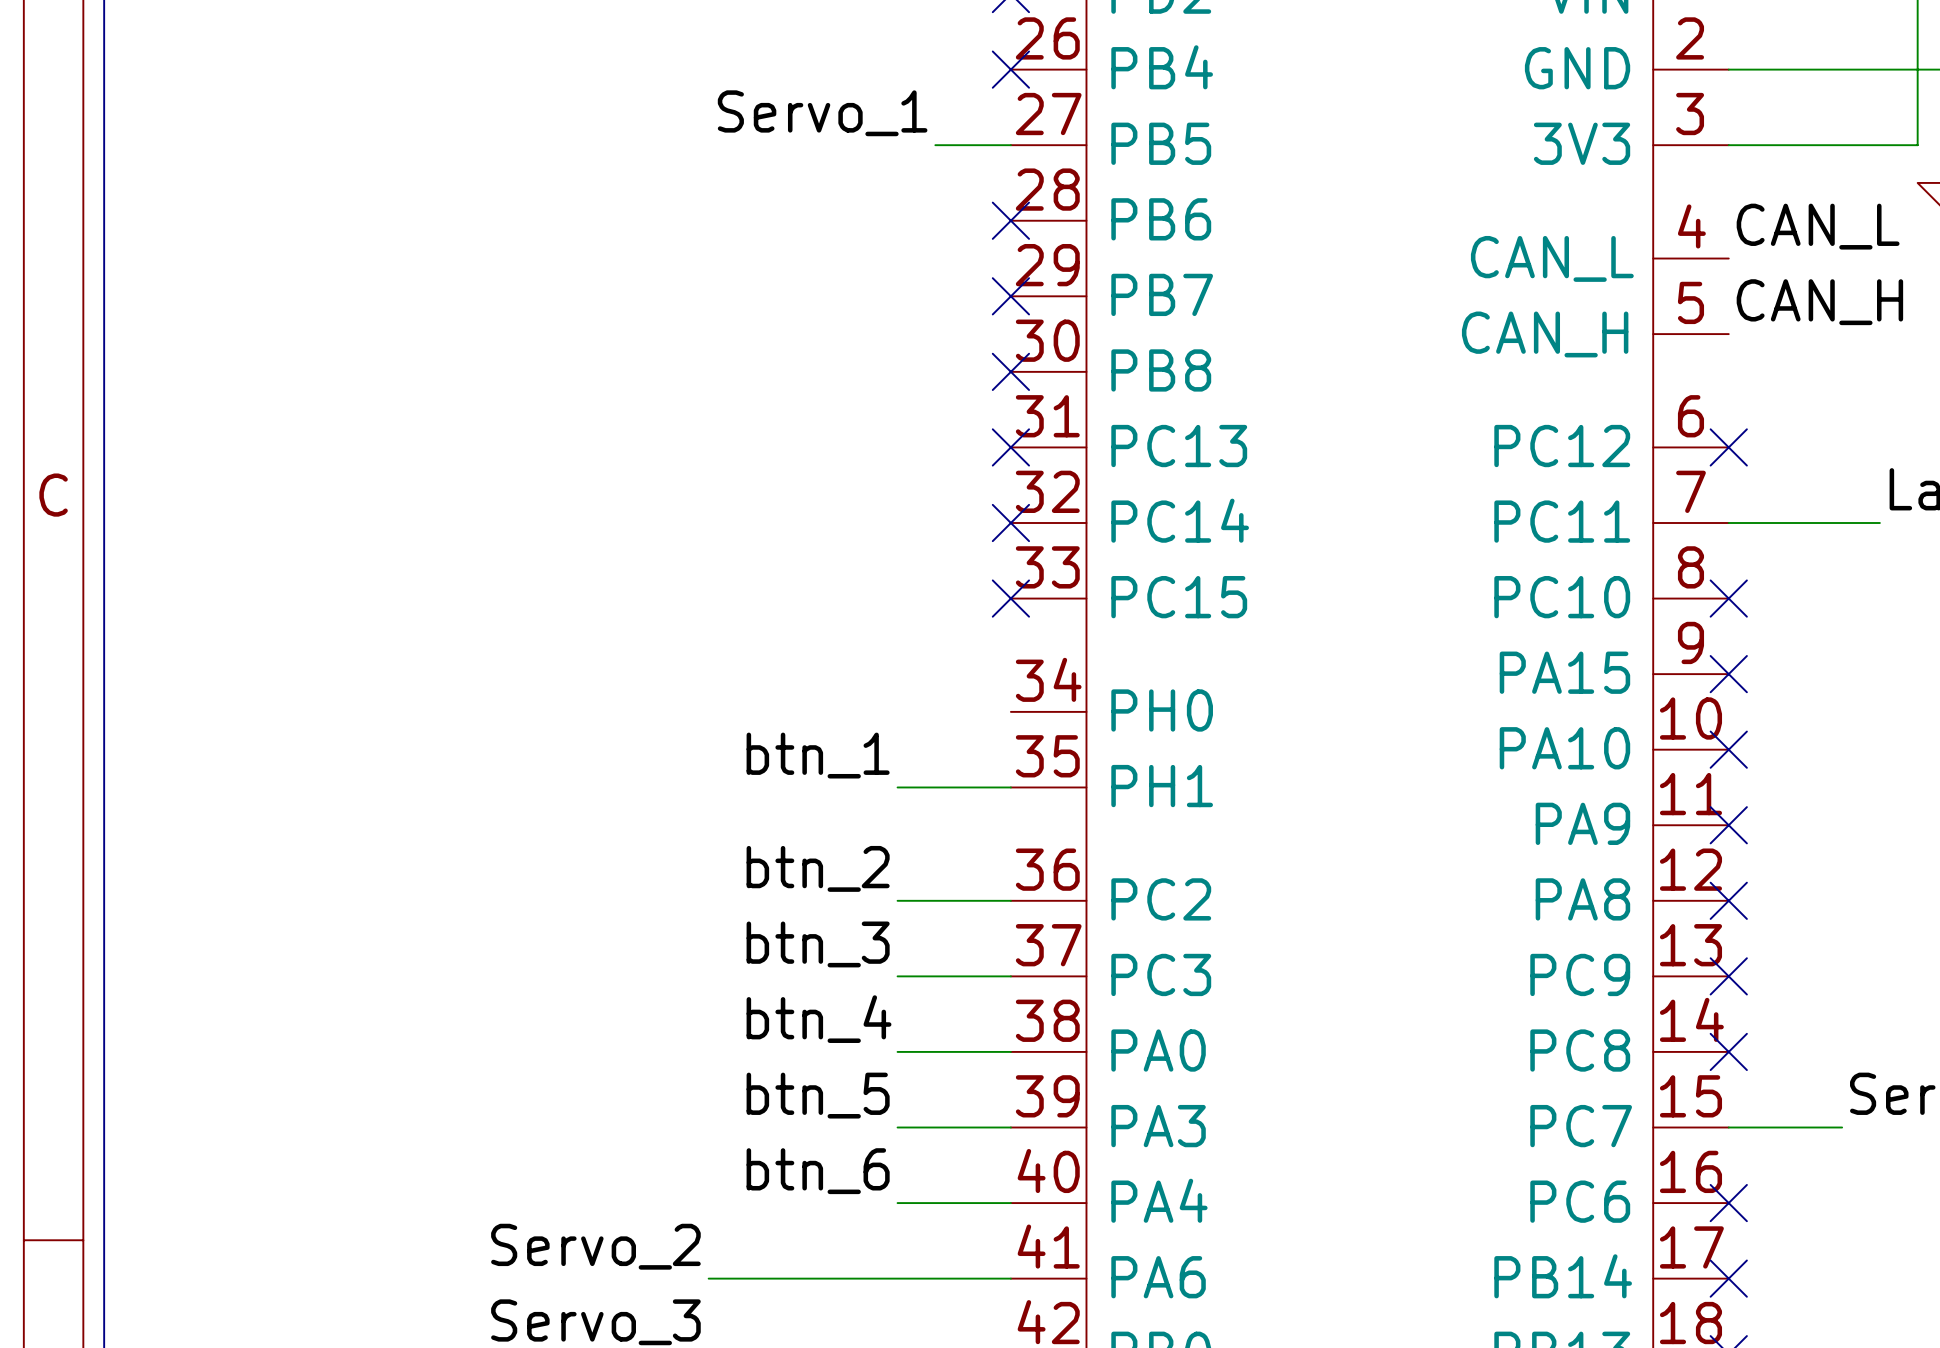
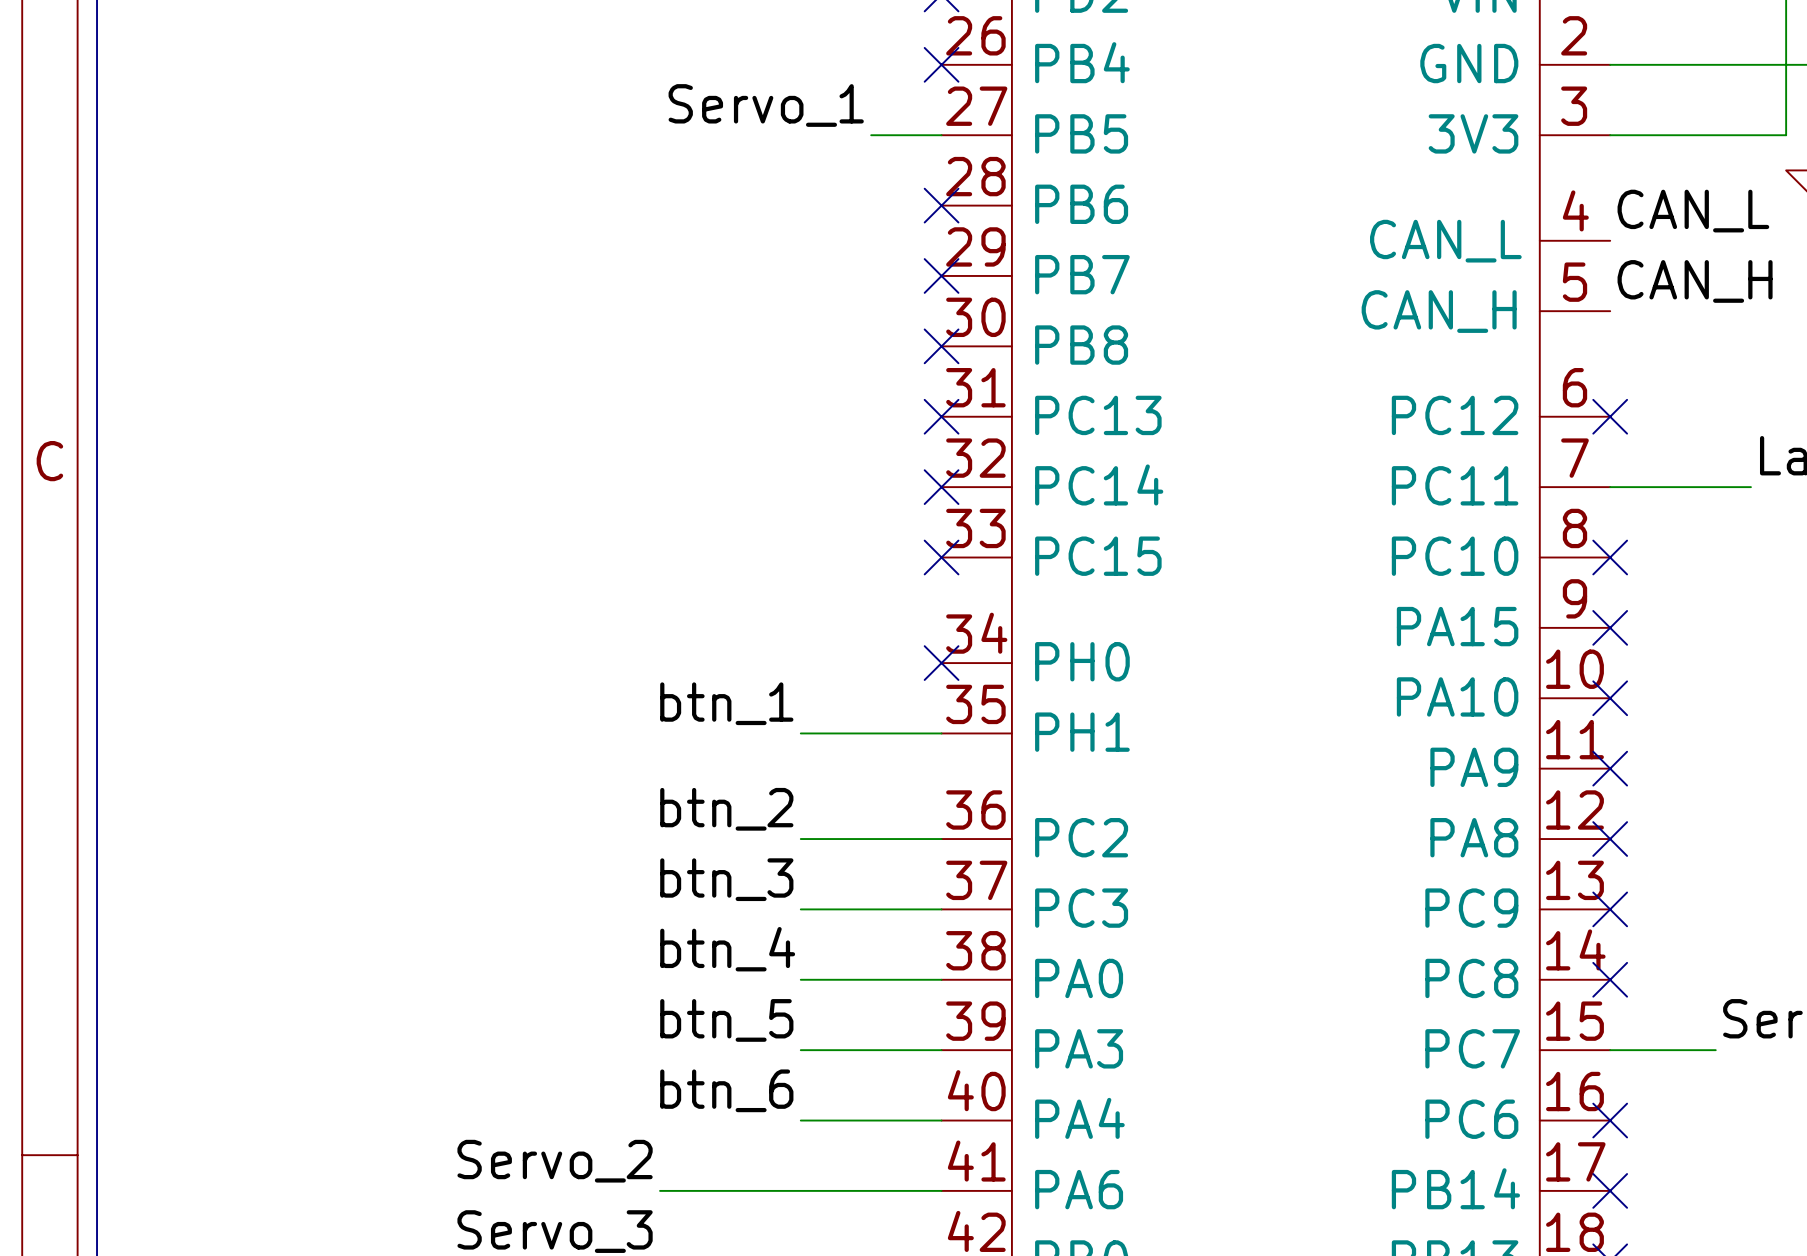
no-connect mark: none -> (941, 663)
label position: btn_1 (818, 755) -> btn_1 (726, 703)
wire: none -> (800, 733) (836, 733)
label position: btn_2 (818, 868) -> btn_2 (726, 809)
wire: none -> (800, 839) (836, 839)
label position: btn_3 (818, 944) -> btn_3 (726, 879)
wire: none -> (800, 909) (836, 909)
label position: btn_4 (819, 1019) -> btn_4 (727, 949)
wire: none -> (800, 979) (836, 979)
label position: btn_5 (818, 1095) -> btn_5 (726, 1020)
wire: none -> (800, 1050) (836, 1050)
label position: btn_6 (818, 1171) -> btn_6 (726, 1090)
wire: none -> (800, 1120) (836, 1120)

